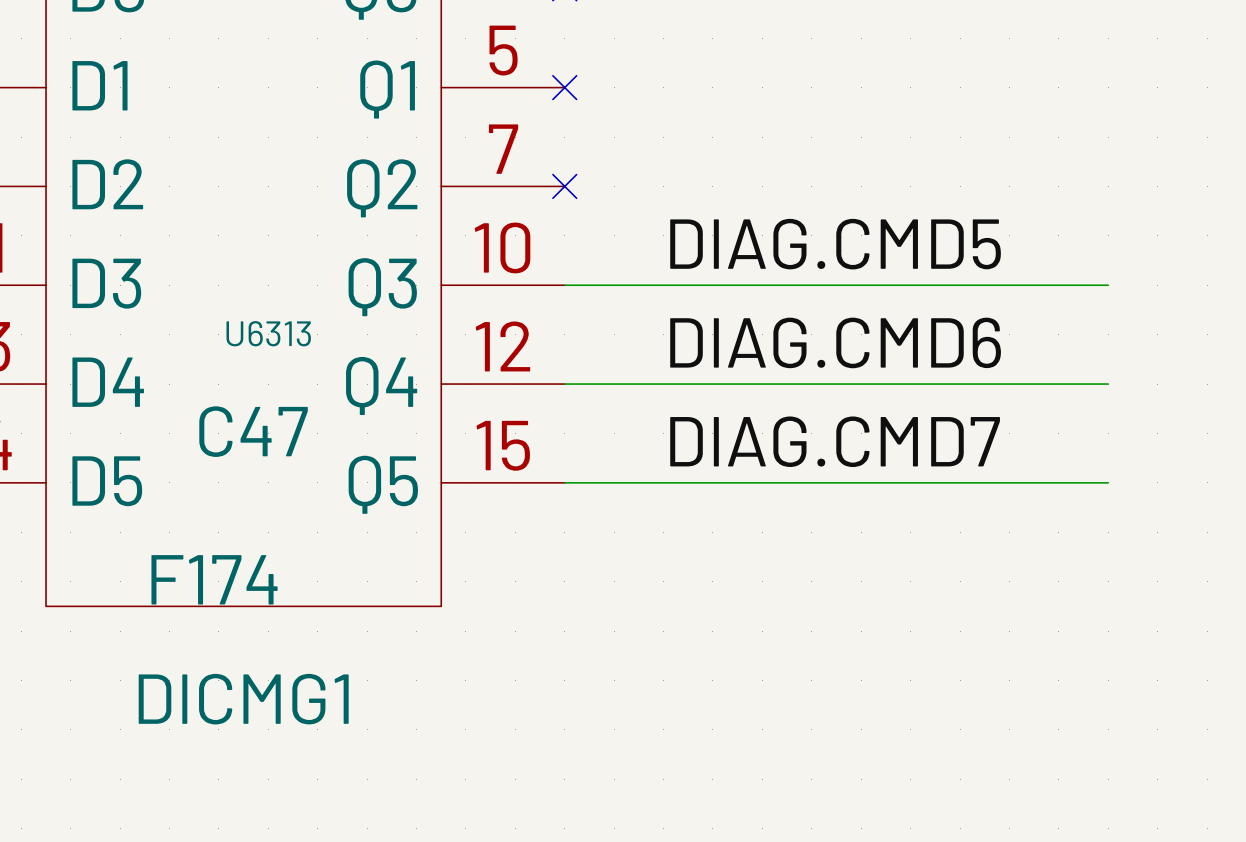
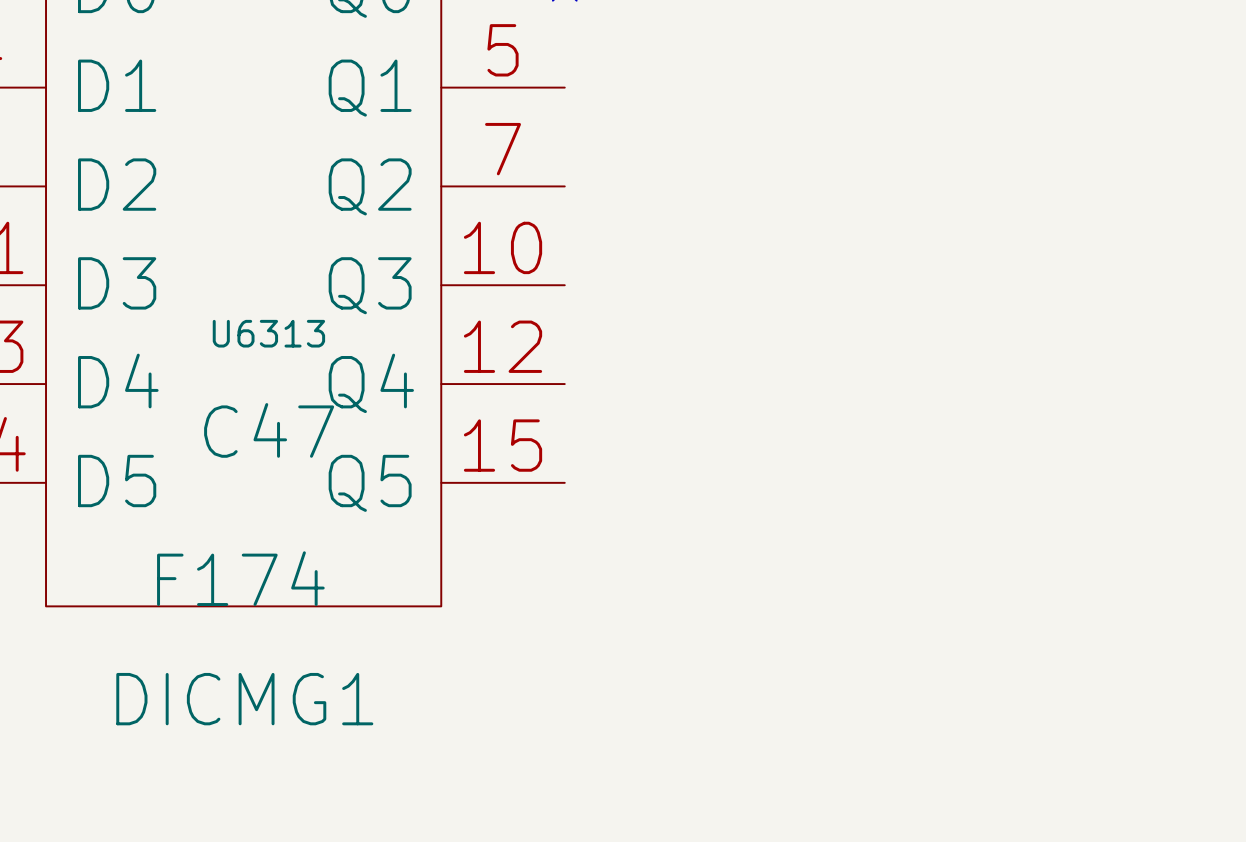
no-connect mark: (564, 87) -> none
no-connect mark: (564, 186) -> none
label: DIAG.CMD5 (835, 244) -> none
wire: (564, 285) (1108, 285) -> none
label: DIAG.CMD6 (835, 342) -> none
wire: (564, 384) (1108, 384) -> none
label: DIAG.CMD7 (835, 441) -> none
wire: (564, 482) (1108, 482) -> none

